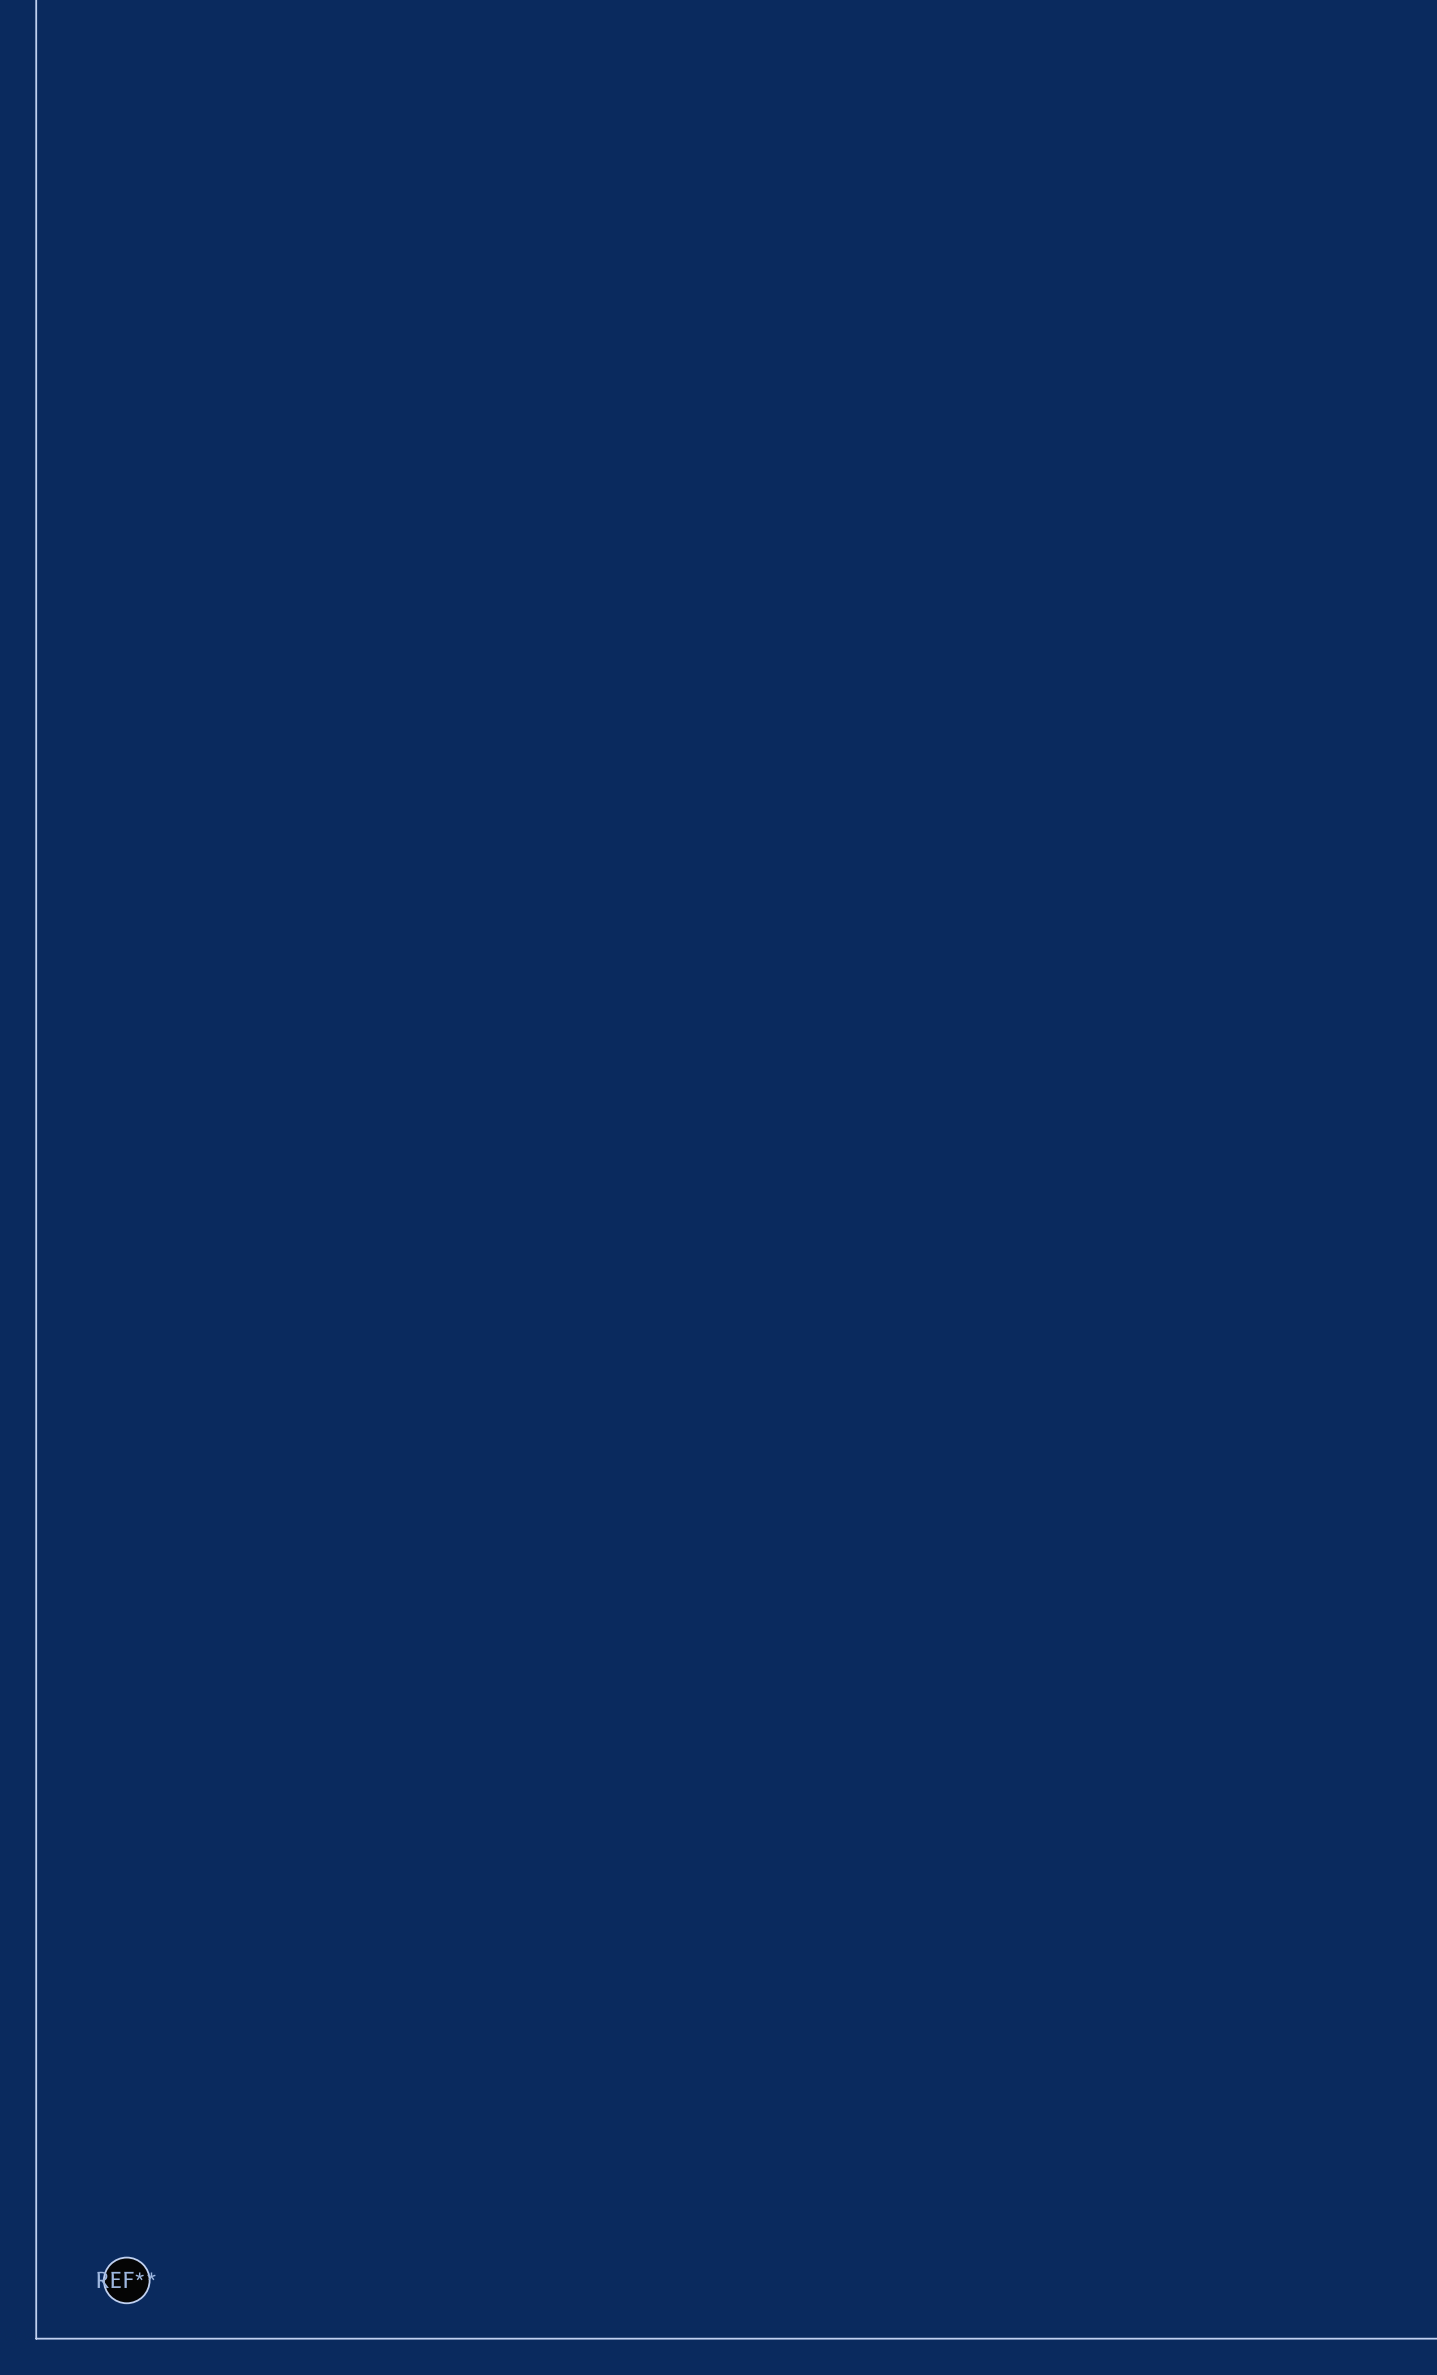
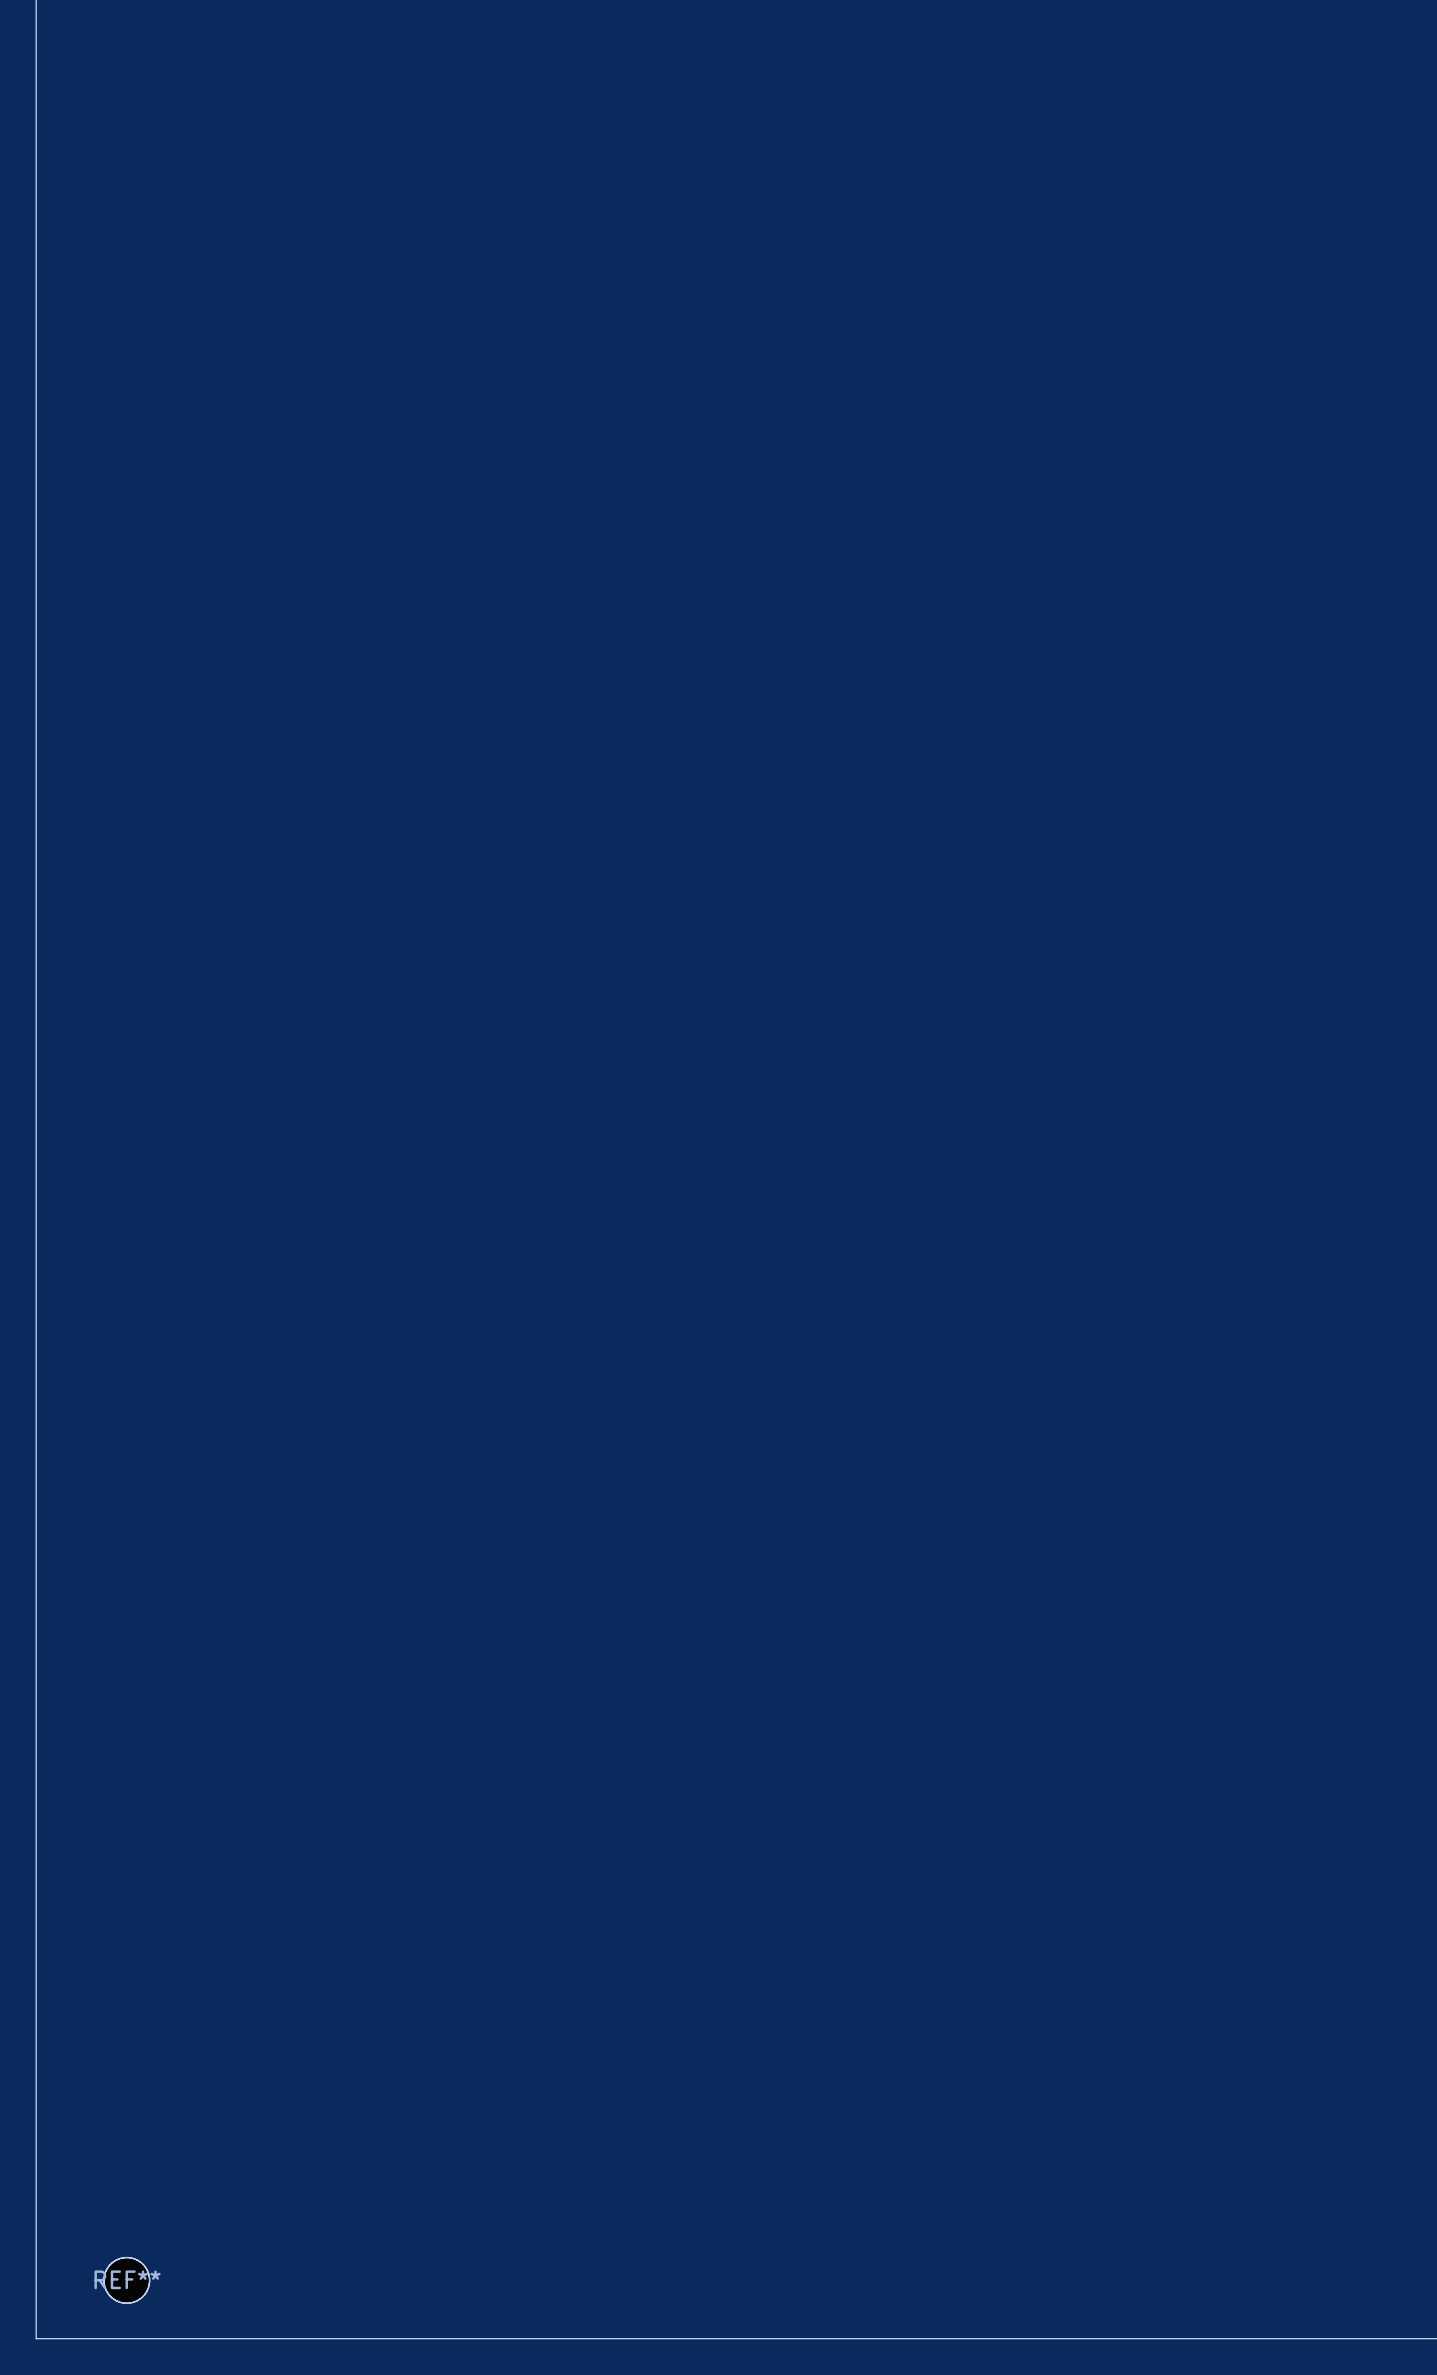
part: none -> (126, 2280)

